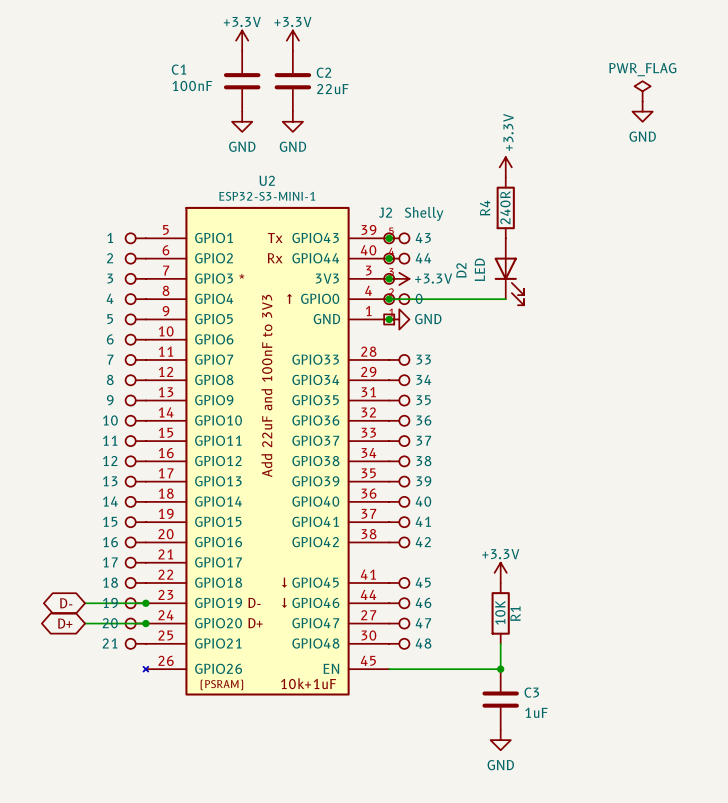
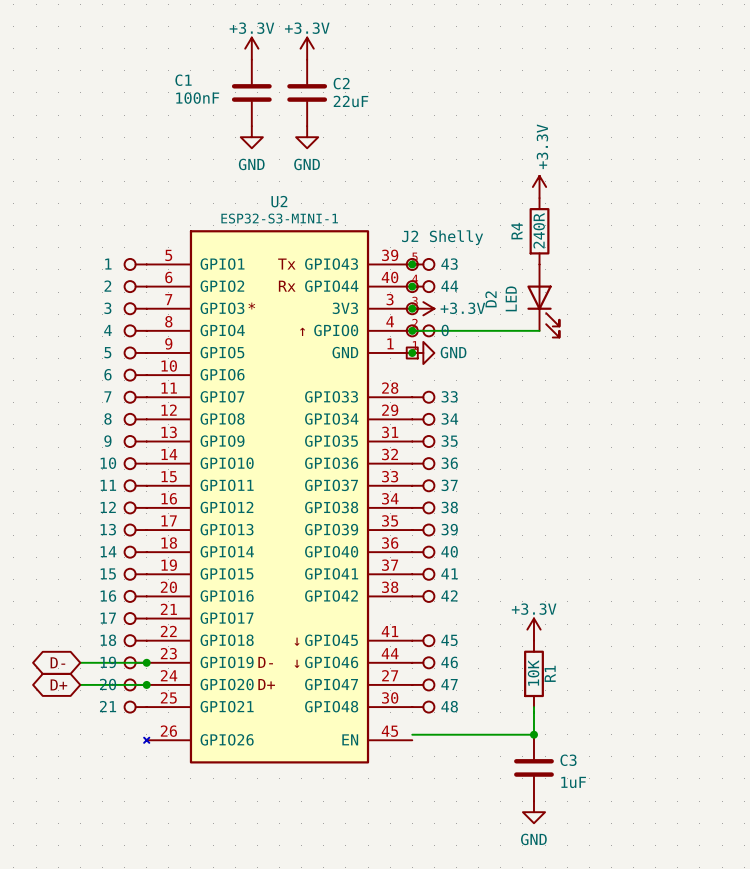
power symbol: PWR_FLAG (642, 91) -> none
power symbol: GND (642, 111) -> none
U2 symbol: [143, 206, 390, 696] -> [144, 230, 413, 764]

